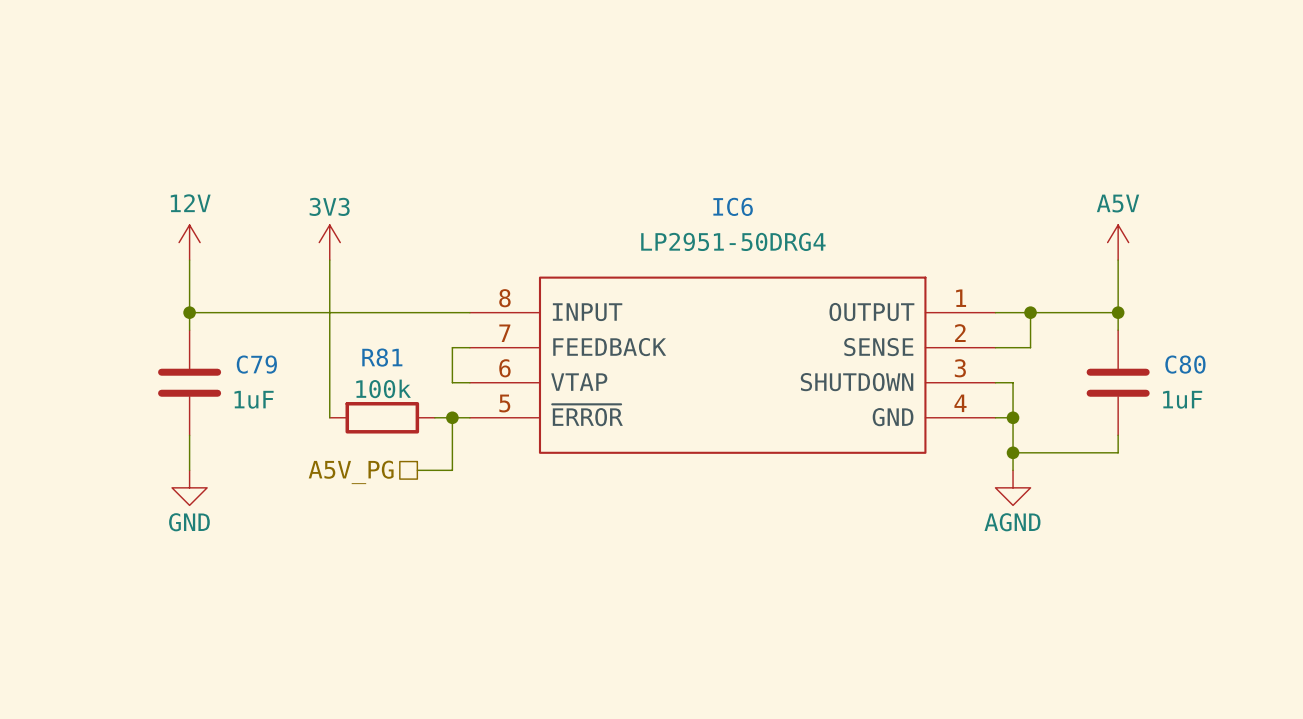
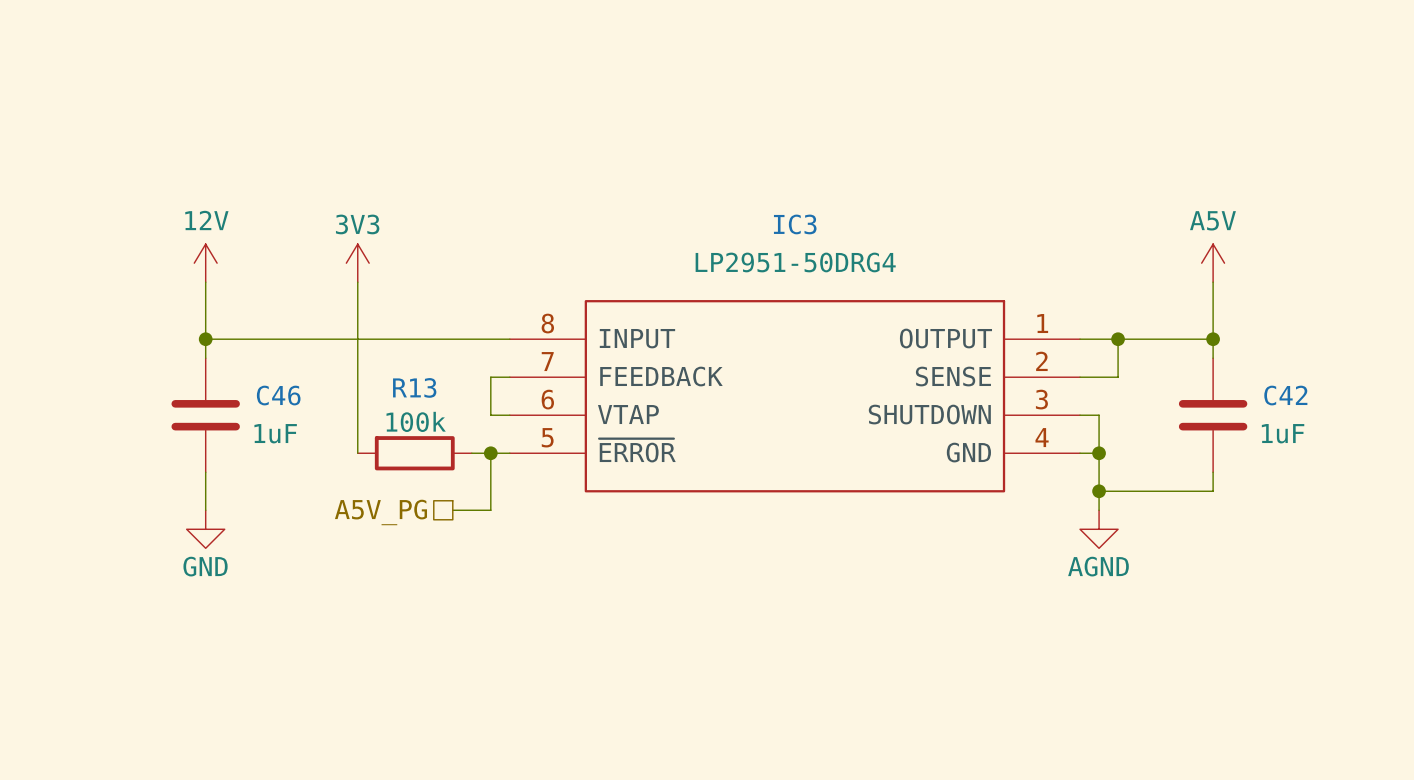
IC6 name: IC6 (733, 206) -> IC3 (795, 224)
R81 name: R81 (382, 357) -> R13 (414, 387)
C79 name: C79 (256, 364) -> C46 (278, 395)
C80 name: C80 (1185, 364) -> C42 (1285, 395)

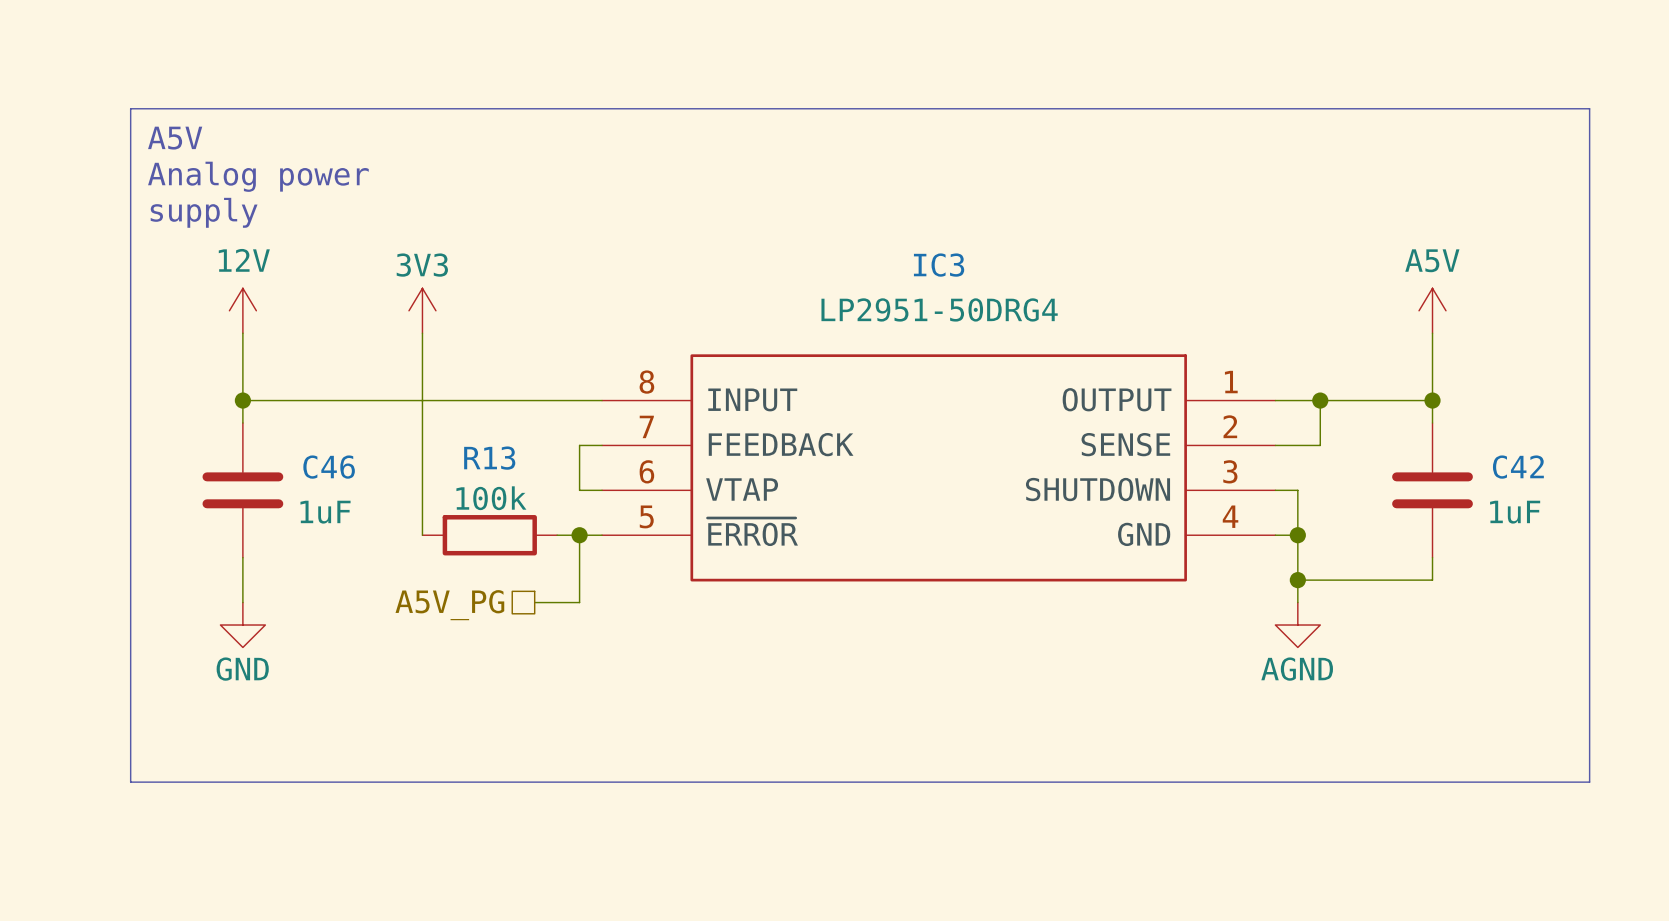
line: none -> (130, 108) (1589, 108) (1589, 782) (130, 782) (130, 108)
text: none -> A5V (175, 138)
text: none -> Analog power (258, 176)
text: none -> supply (204, 212)

